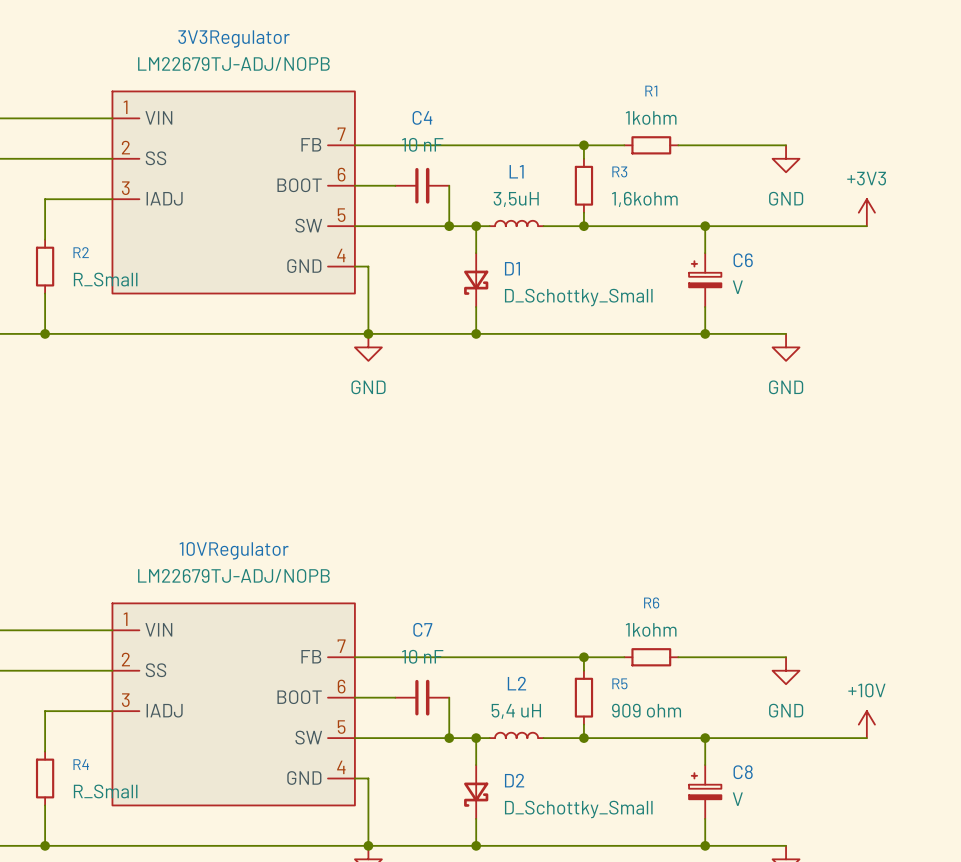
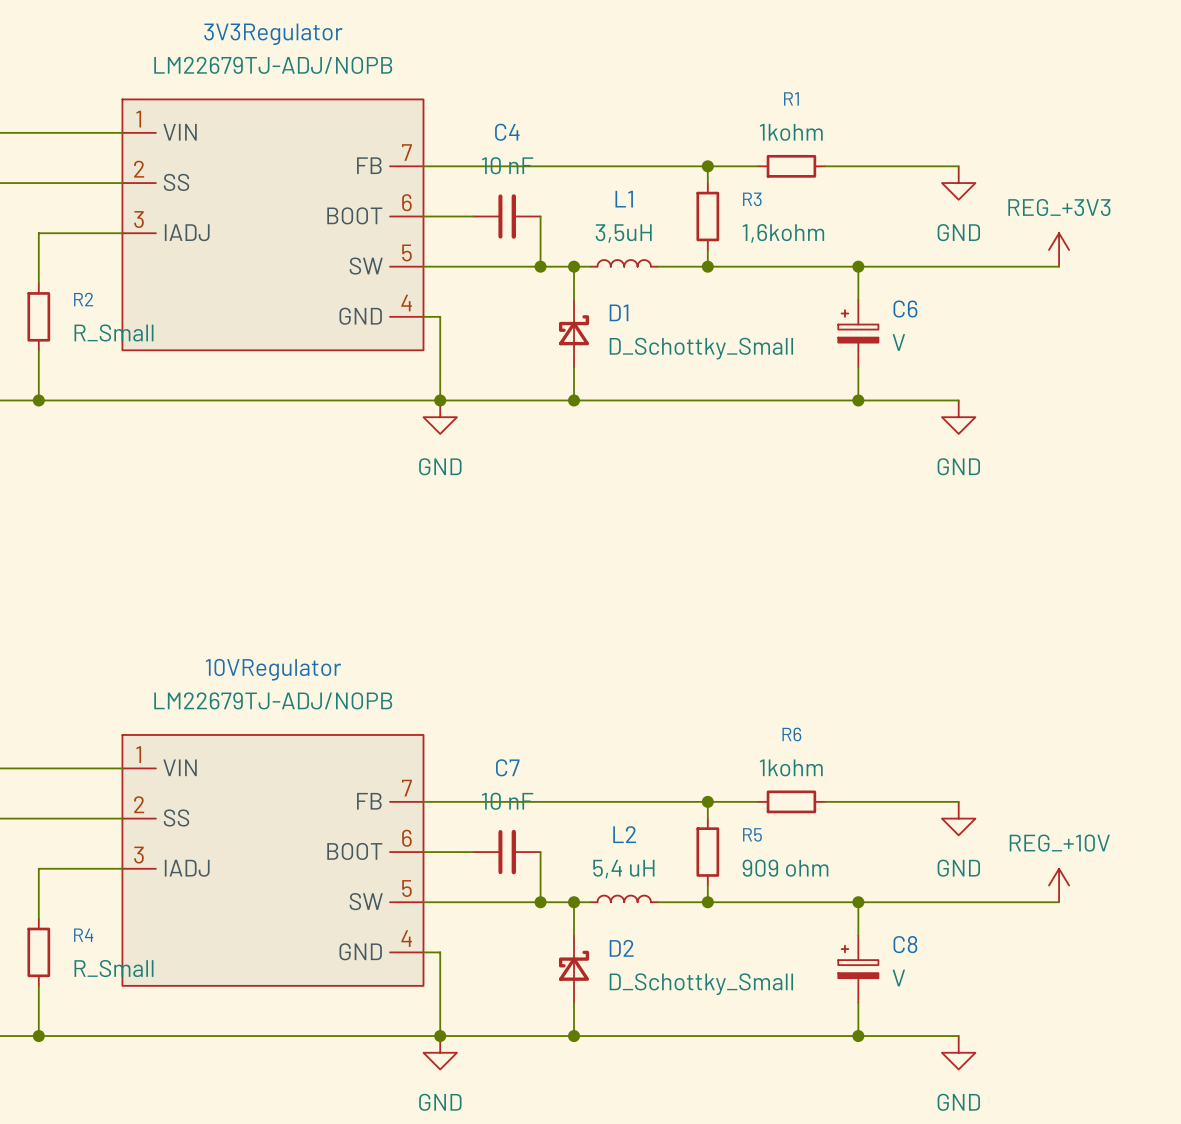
power symbol: +3V3 (866, 212) -> REG_+3V3 (1059, 249)
D1 rotation: 0° (476, 282) -> 180° (574, 330)
power symbol: +10V (866, 724) -> REG_+10V (1059, 885)
D2 rotation: 0° (476, 794) -> 180° (574, 965)

